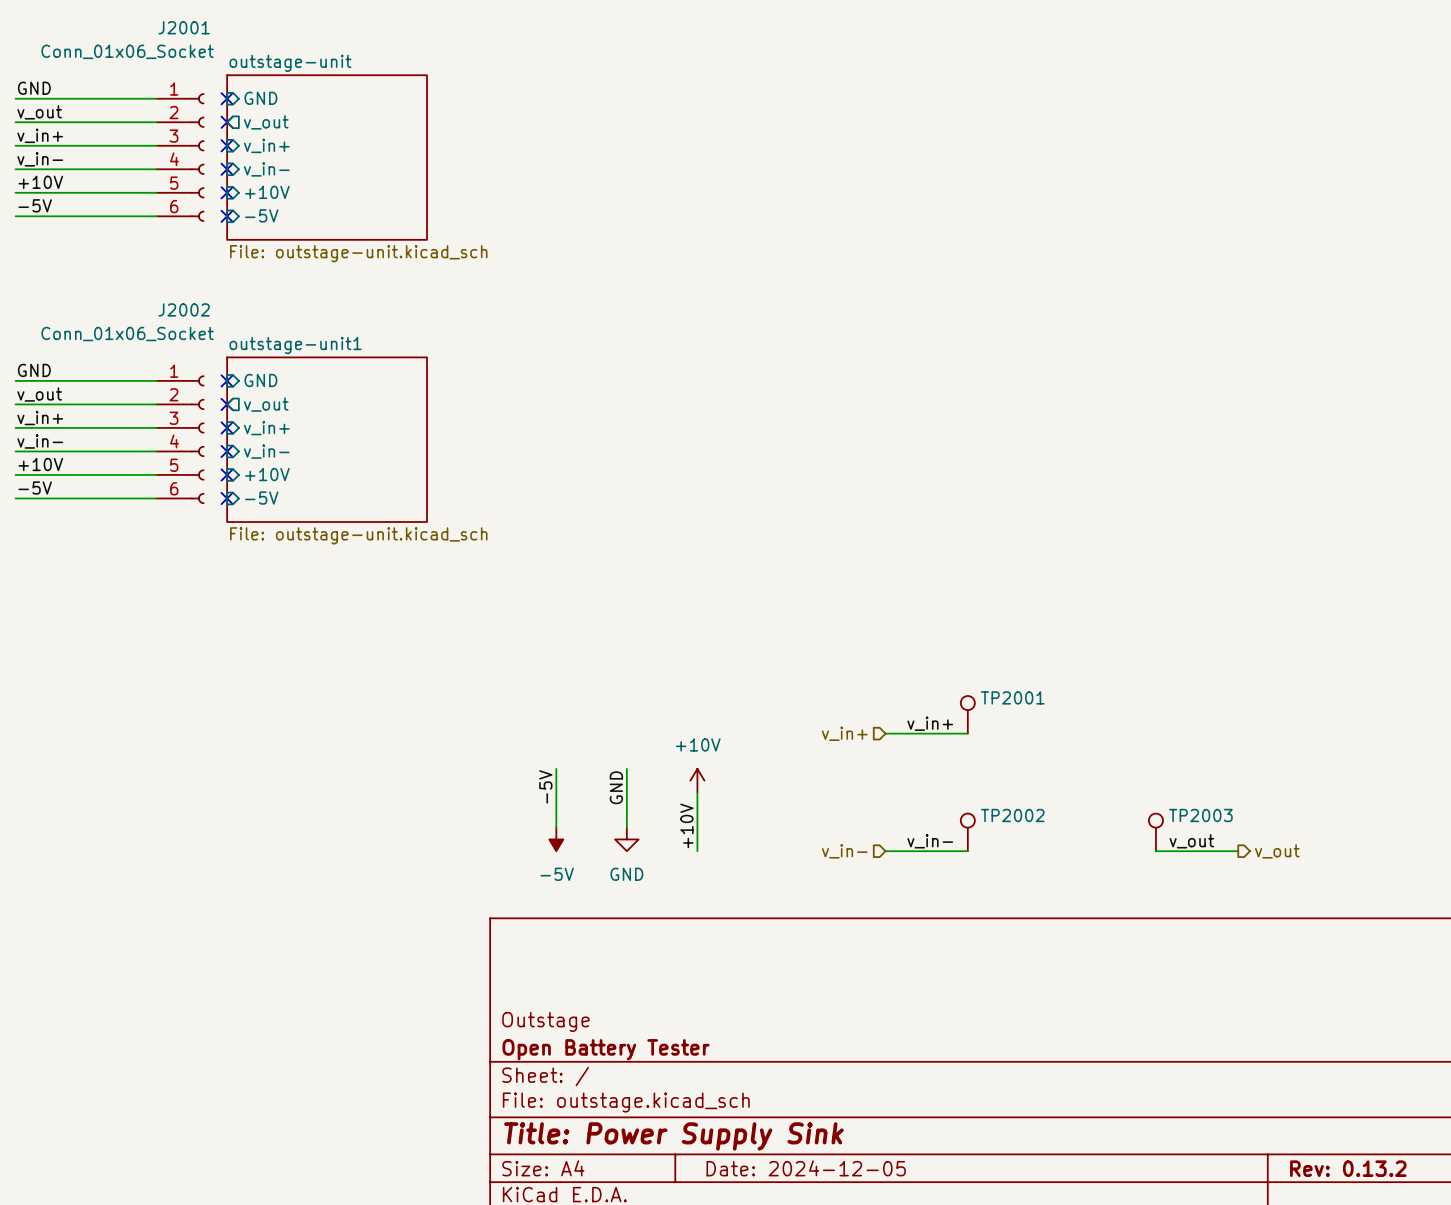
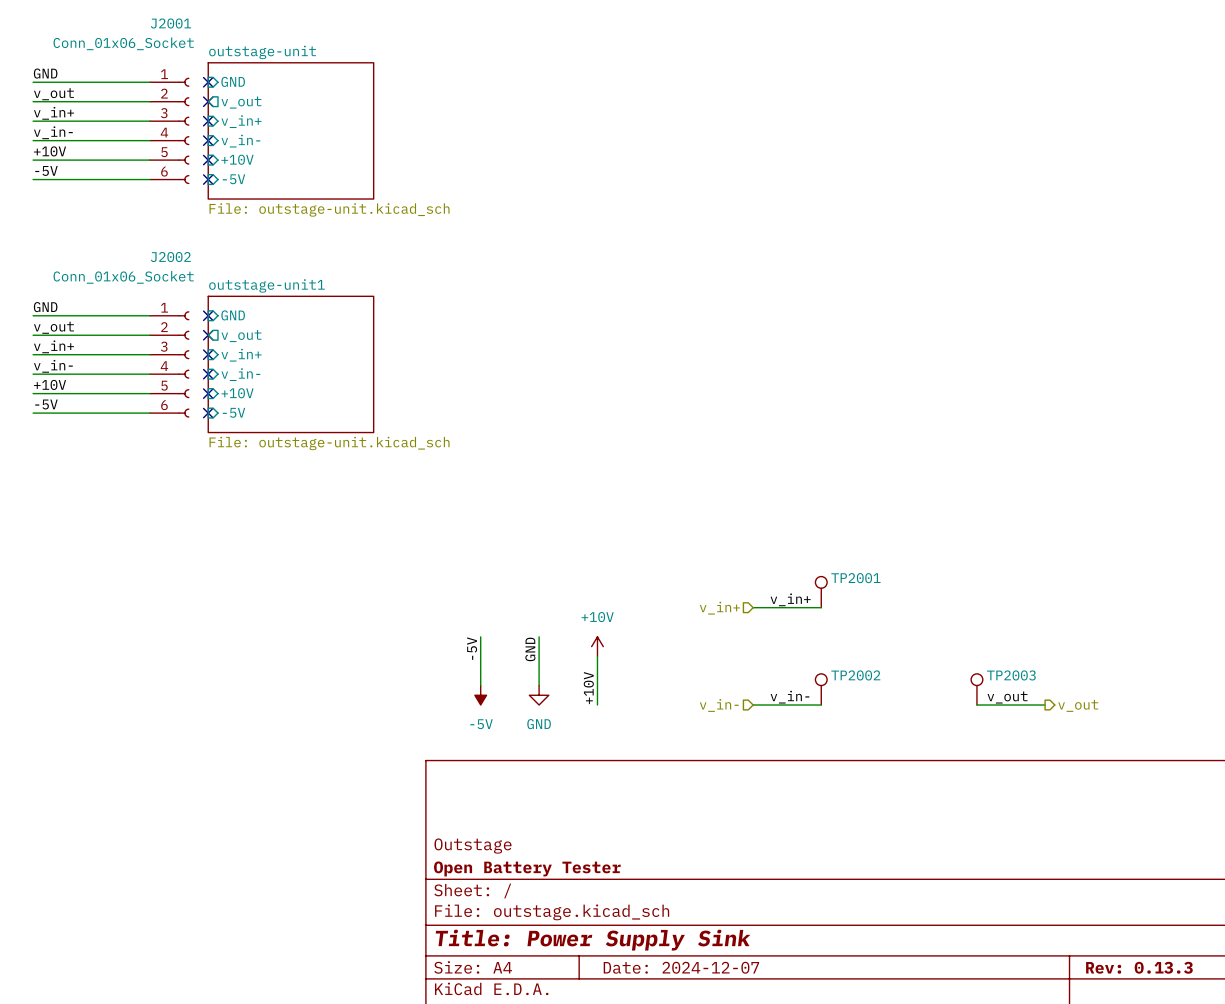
title block: Date: 2024-12-05 (806, 1168) -> Date: 2024-12-07 (681, 967)
title block: Rev: 0.13.2 (1348, 1168) -> Rev: 0.13.3 (1139, 967)

